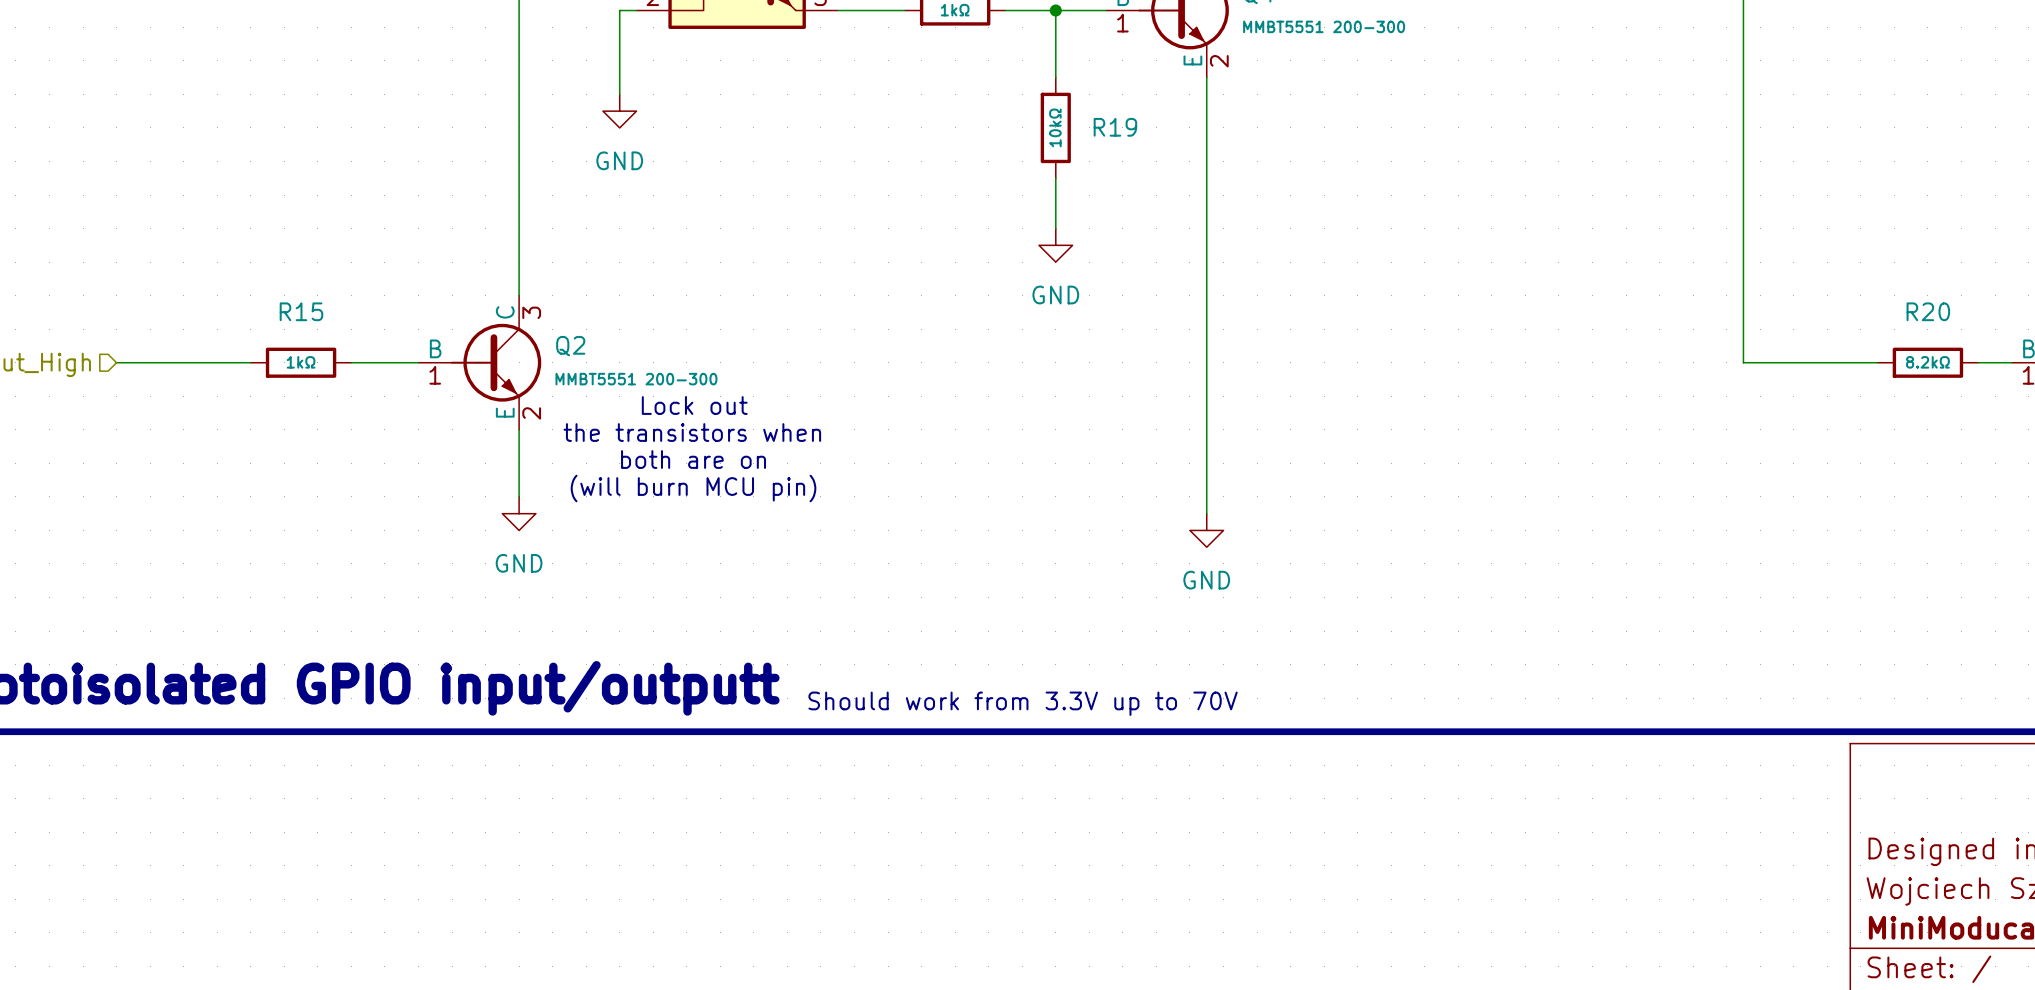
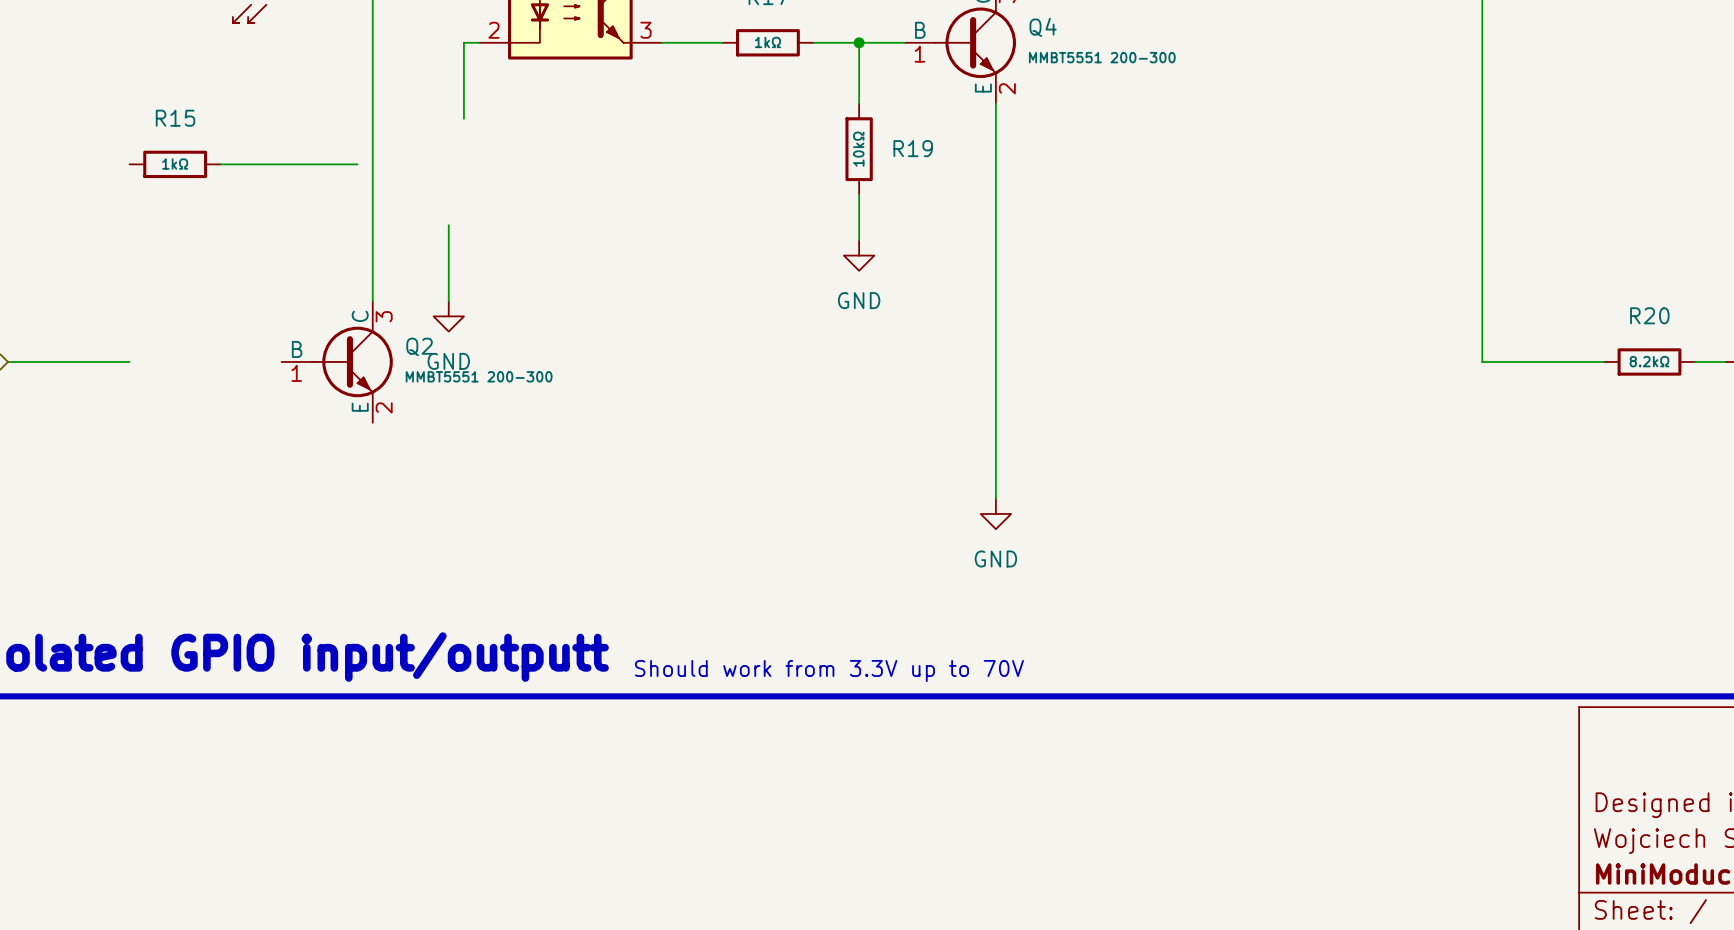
power symbol: GND (619, 111) -> none
wire: none -> (220, 164) (357, 164)
wire: none -> (448, 225) (448, 301)
power symbol: none -> GND (448, 316)
R15 position: (301, 362) -> (175, 164)
wire: (351, 362) (418, 362) -> none
text: Lock out (694, 405) -> none
wire: (519, 429) (519, 496) -> none
text: the transistors when (692, 432) -> none
text: both are on (693, 459) -> none
text: (will burn MCU pin) (693, 488) -> none
power symbol: GND (519, 513) -> none

